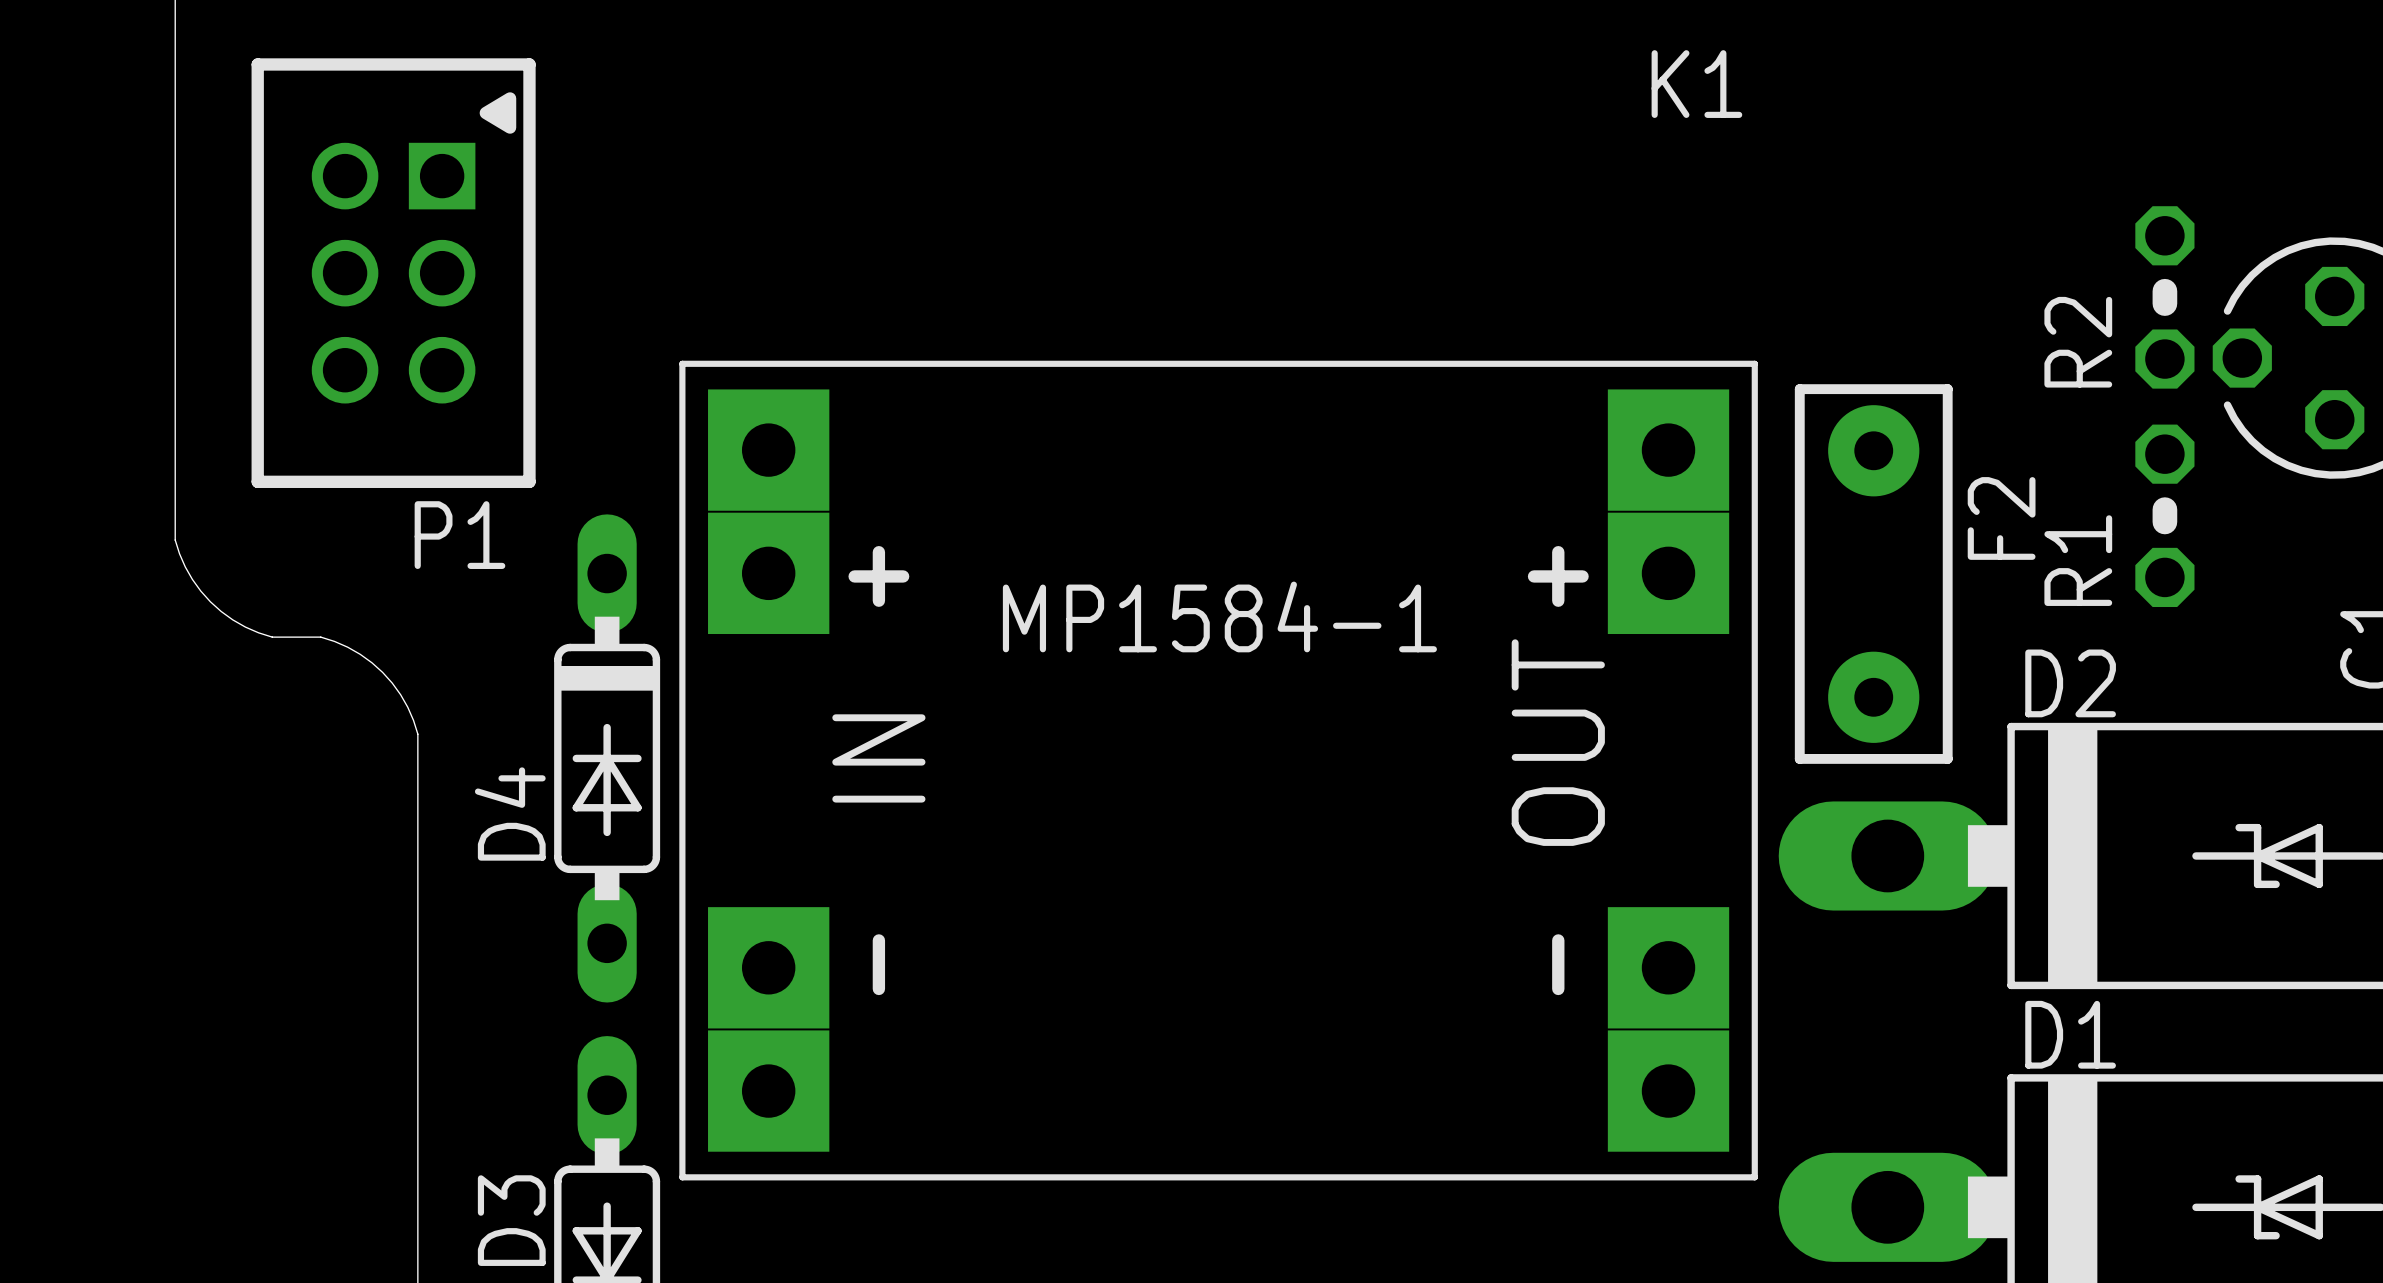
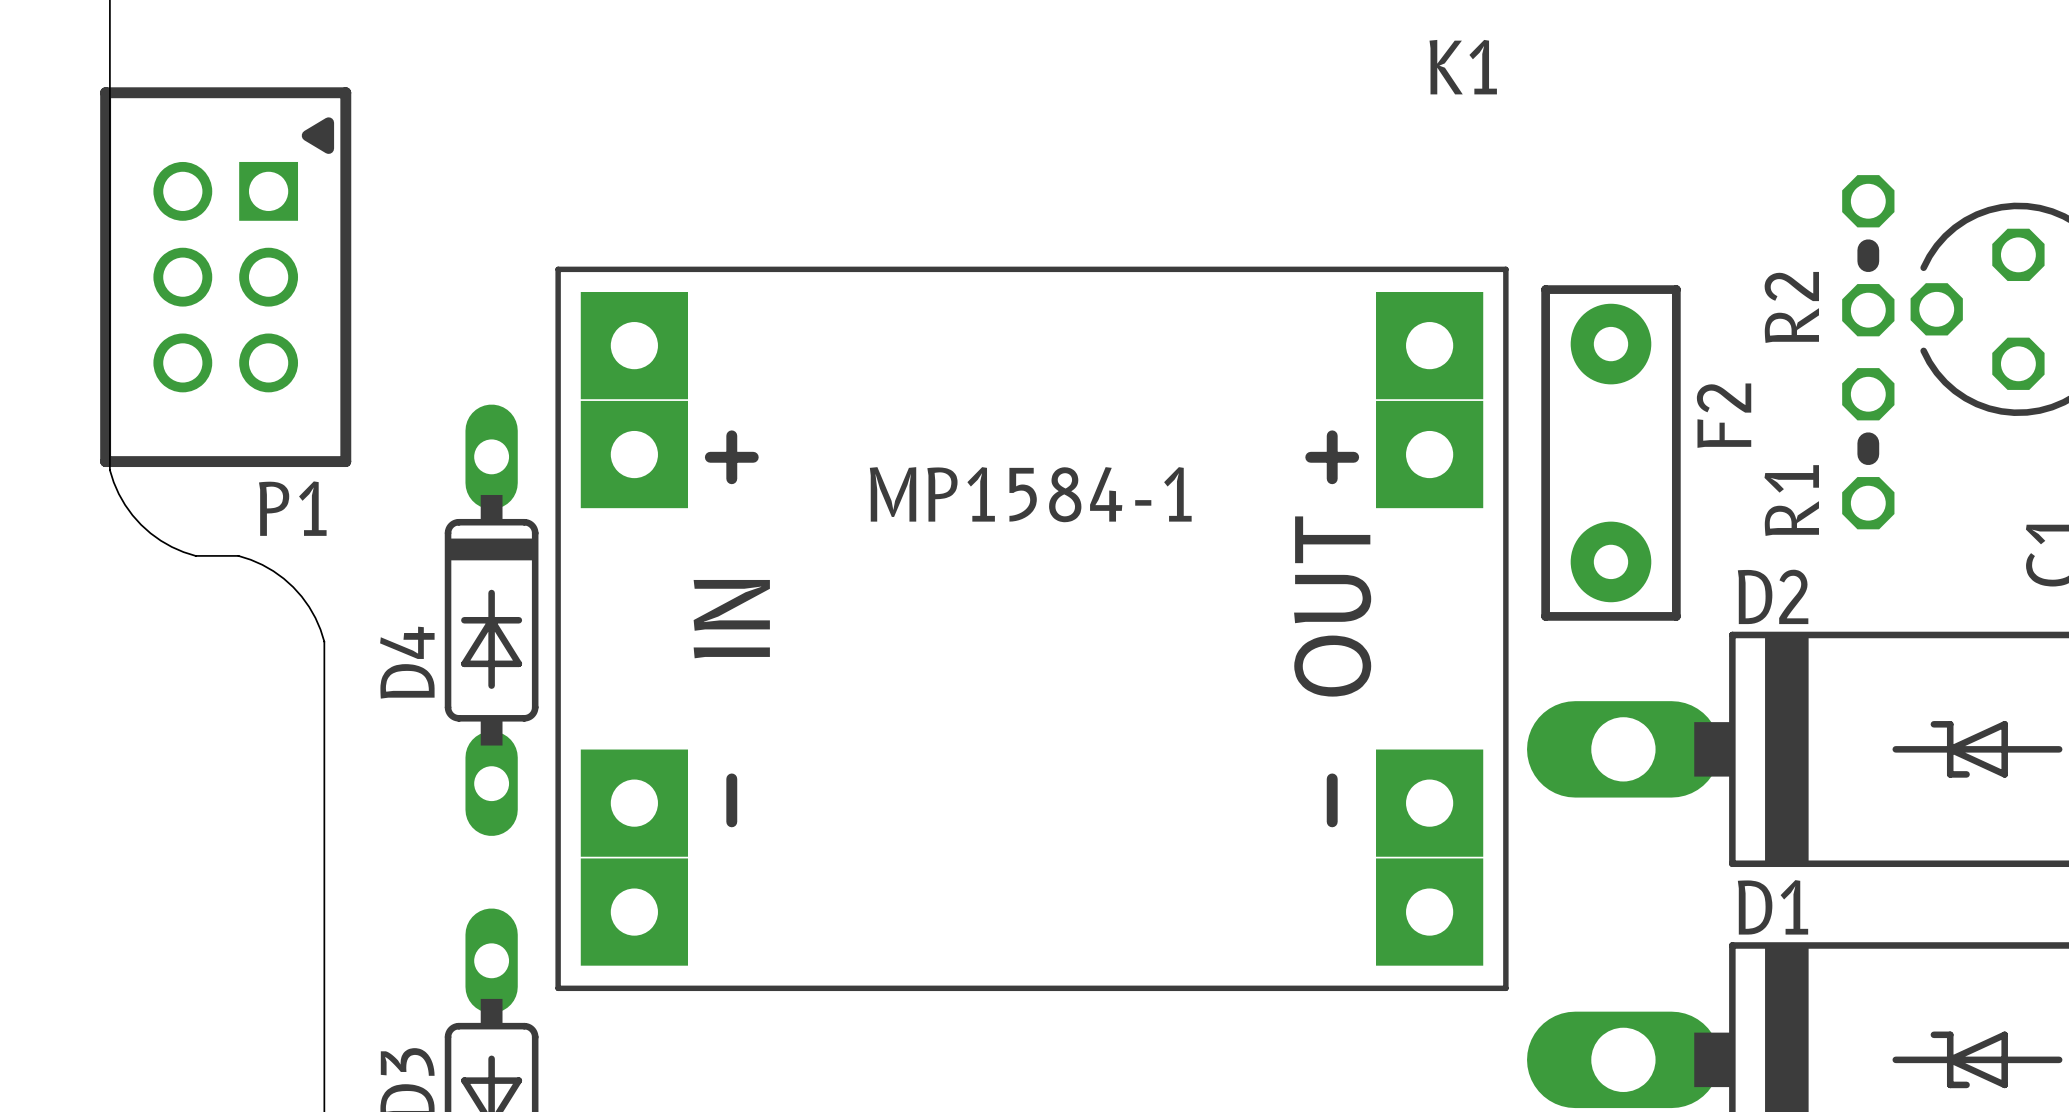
P1 position: (393, 273) -> (225, 277)
F2 position: (1873, 574) -> (1610, 453)
D4 position: (607, 758) -> (491, 620)
MP1584-1 position: (1218, 770) -> (1032, 628)

